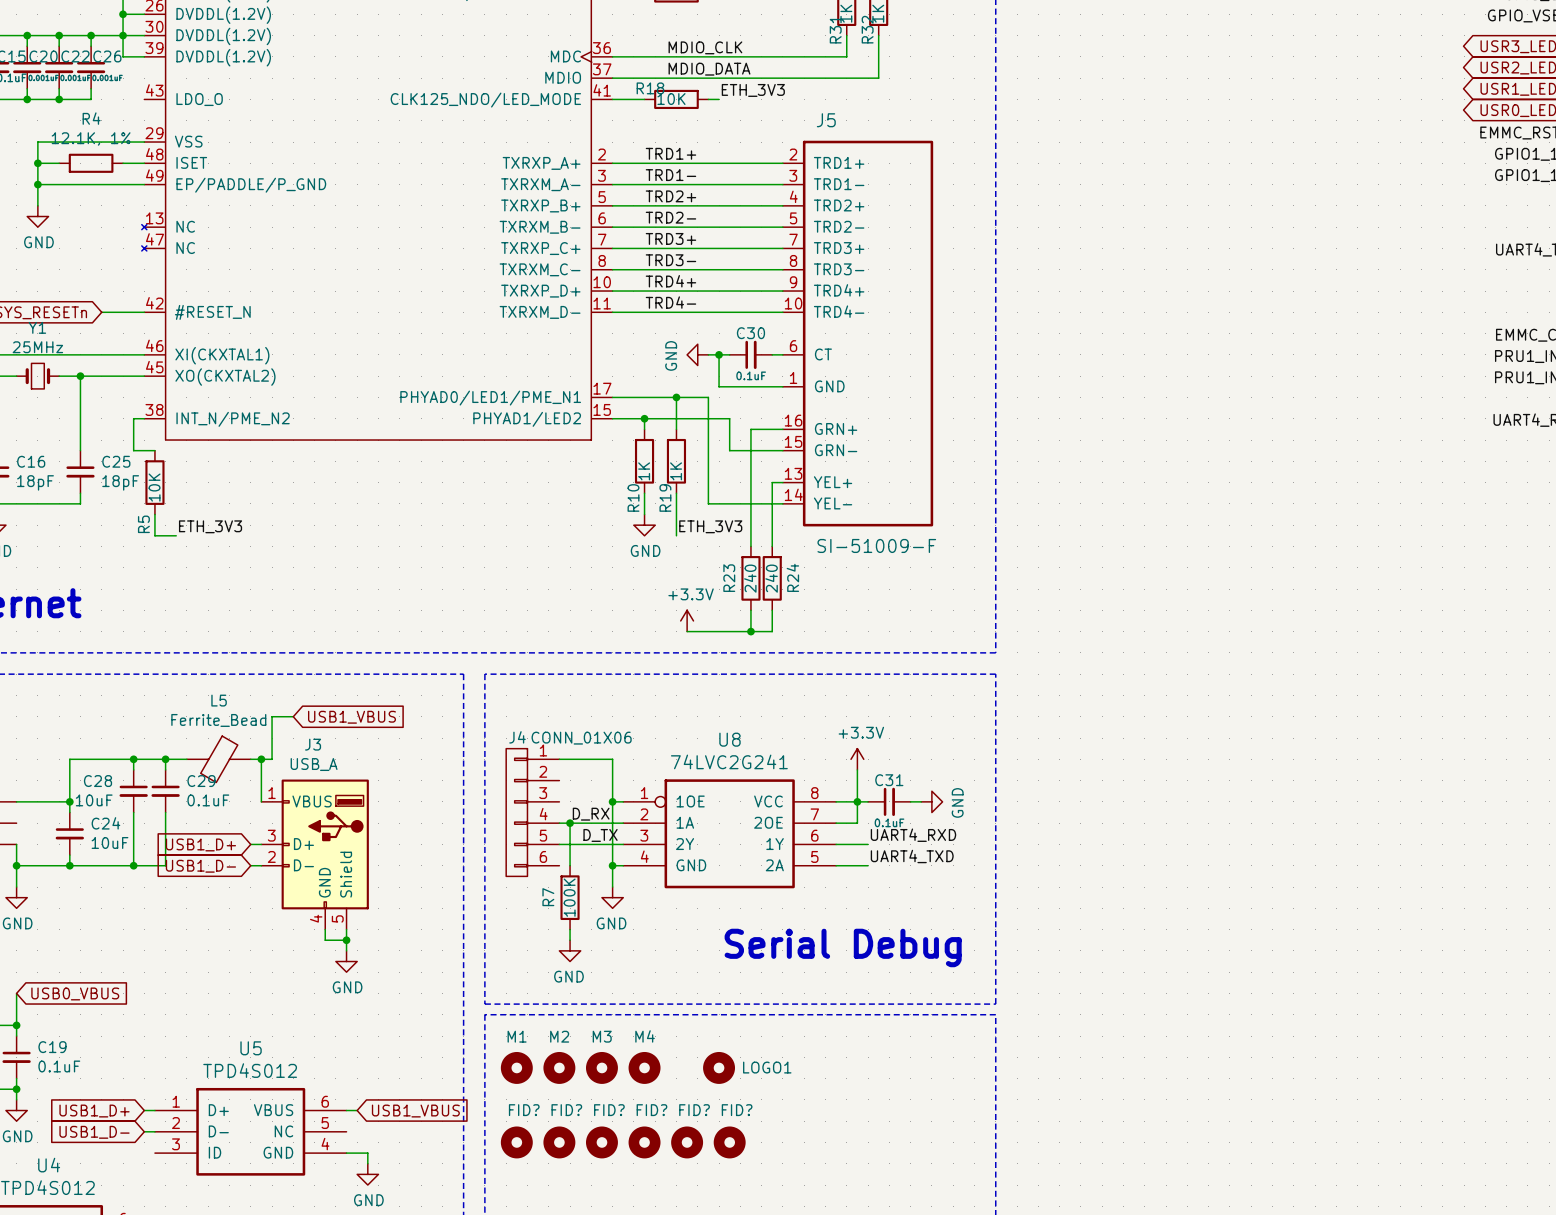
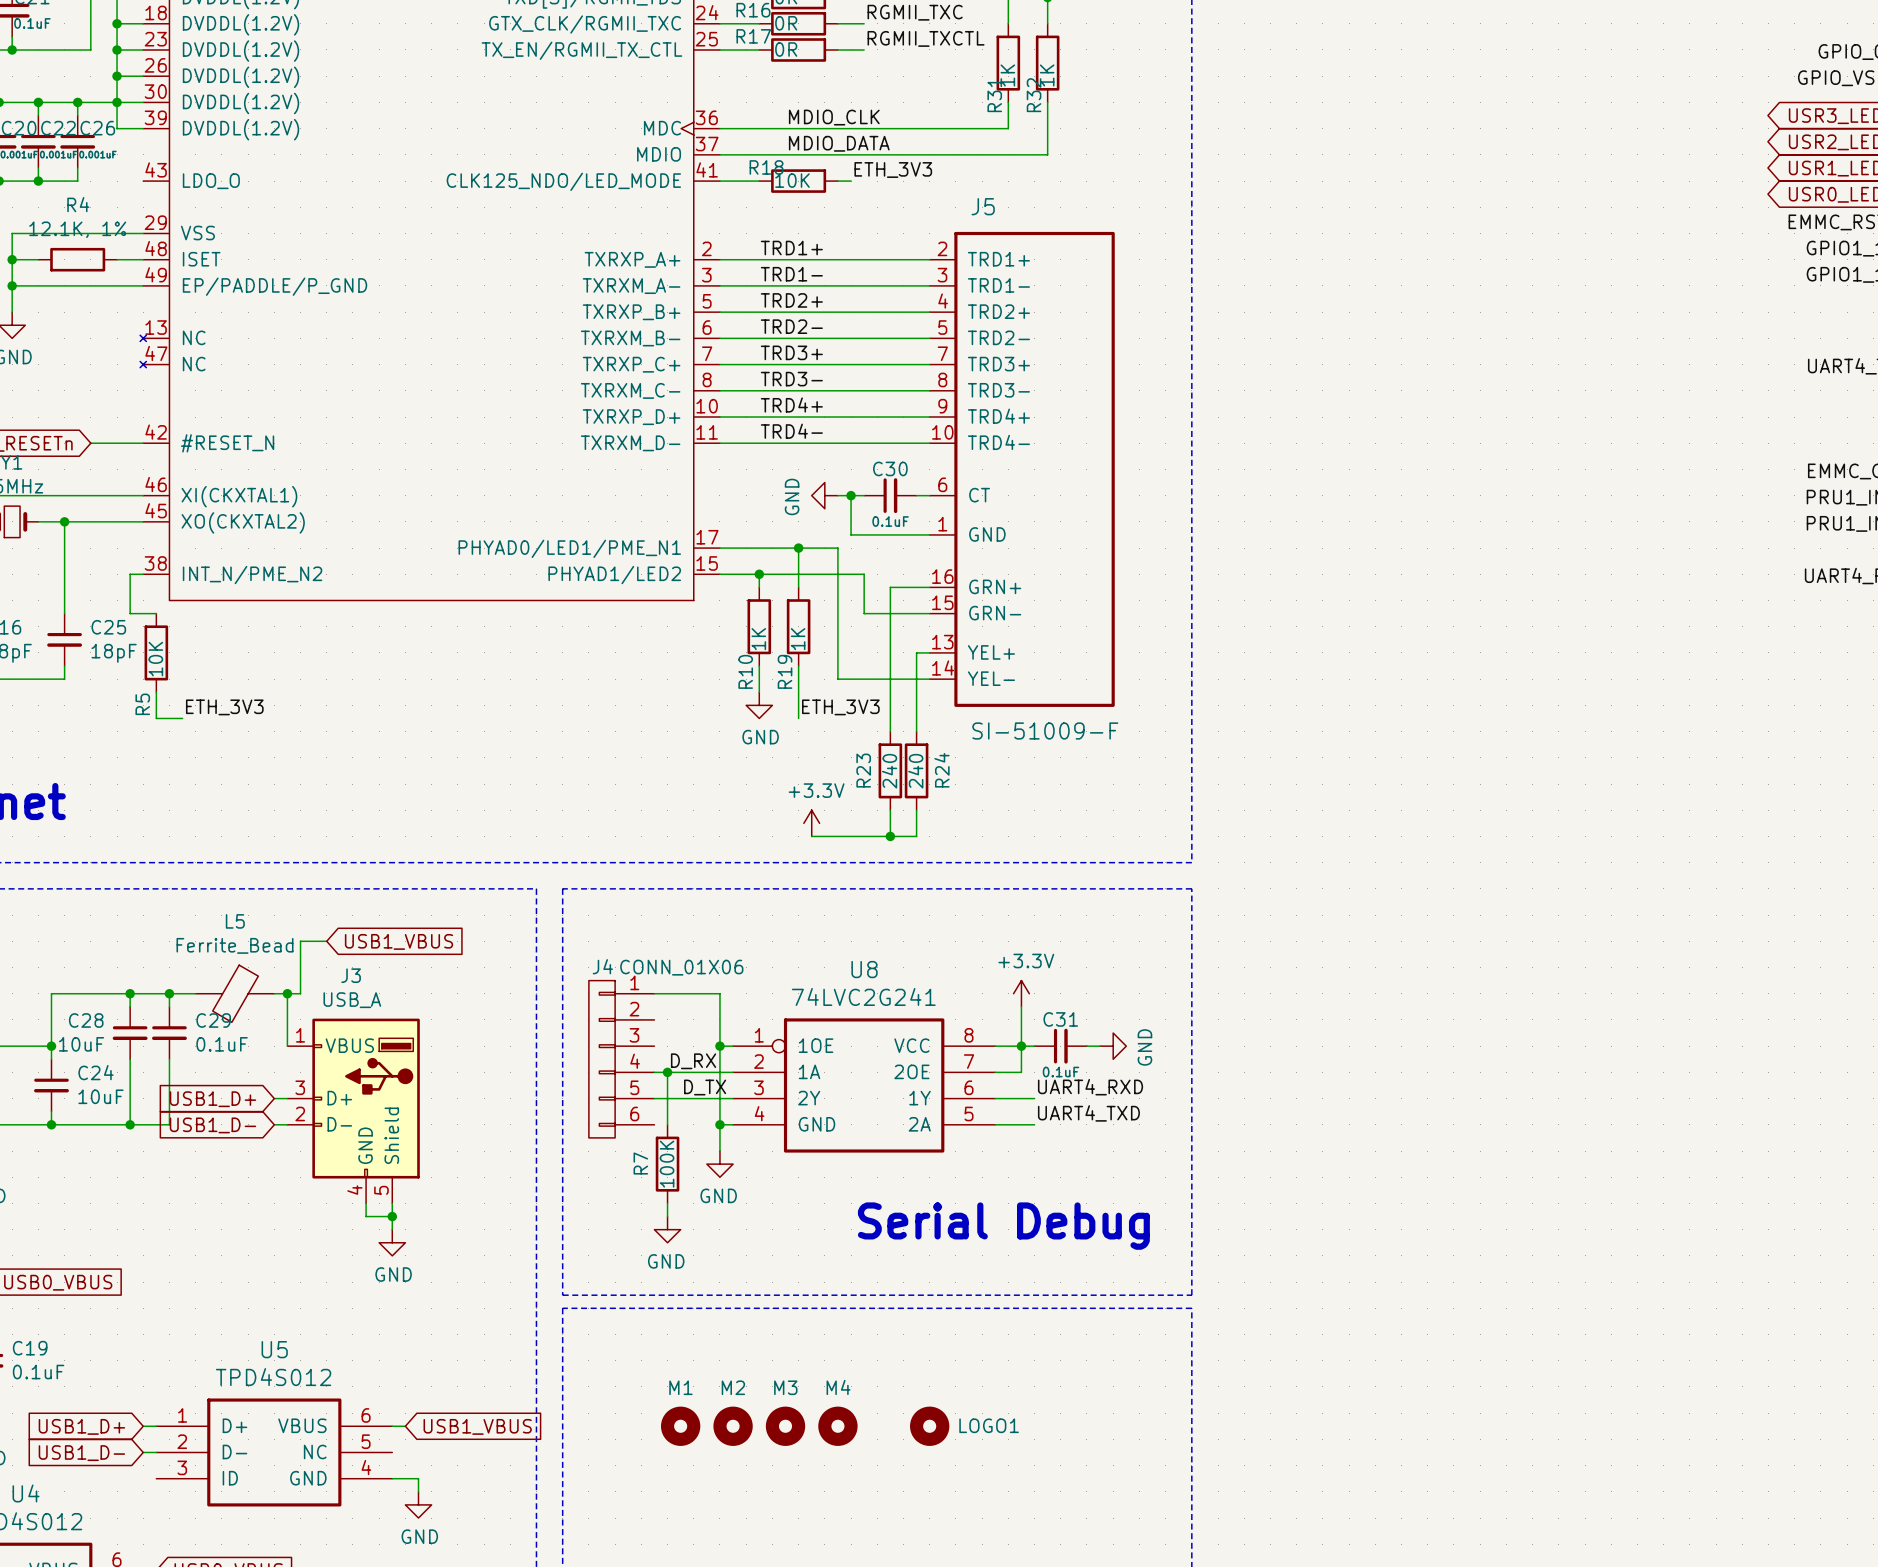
M1 position: (516, 1067) -> (680, 1426)
M2 position: (559, 1067) -> (733, 1426)
M3 position: (601, 1067) -> (785, 1426)
M4 position: (644, 1067) -> (837, 1426)
LOGO1 position: (719, 1067) -> (929, 1426)
FID?: (516, 1142) -> none
FID?: (559, 1142) -> none
FID?: (601, 1142) -> none
FID?: (644, 1142) -> none
FID?: (687, 1142) -> none
FID?: (729, 1142) -> none

